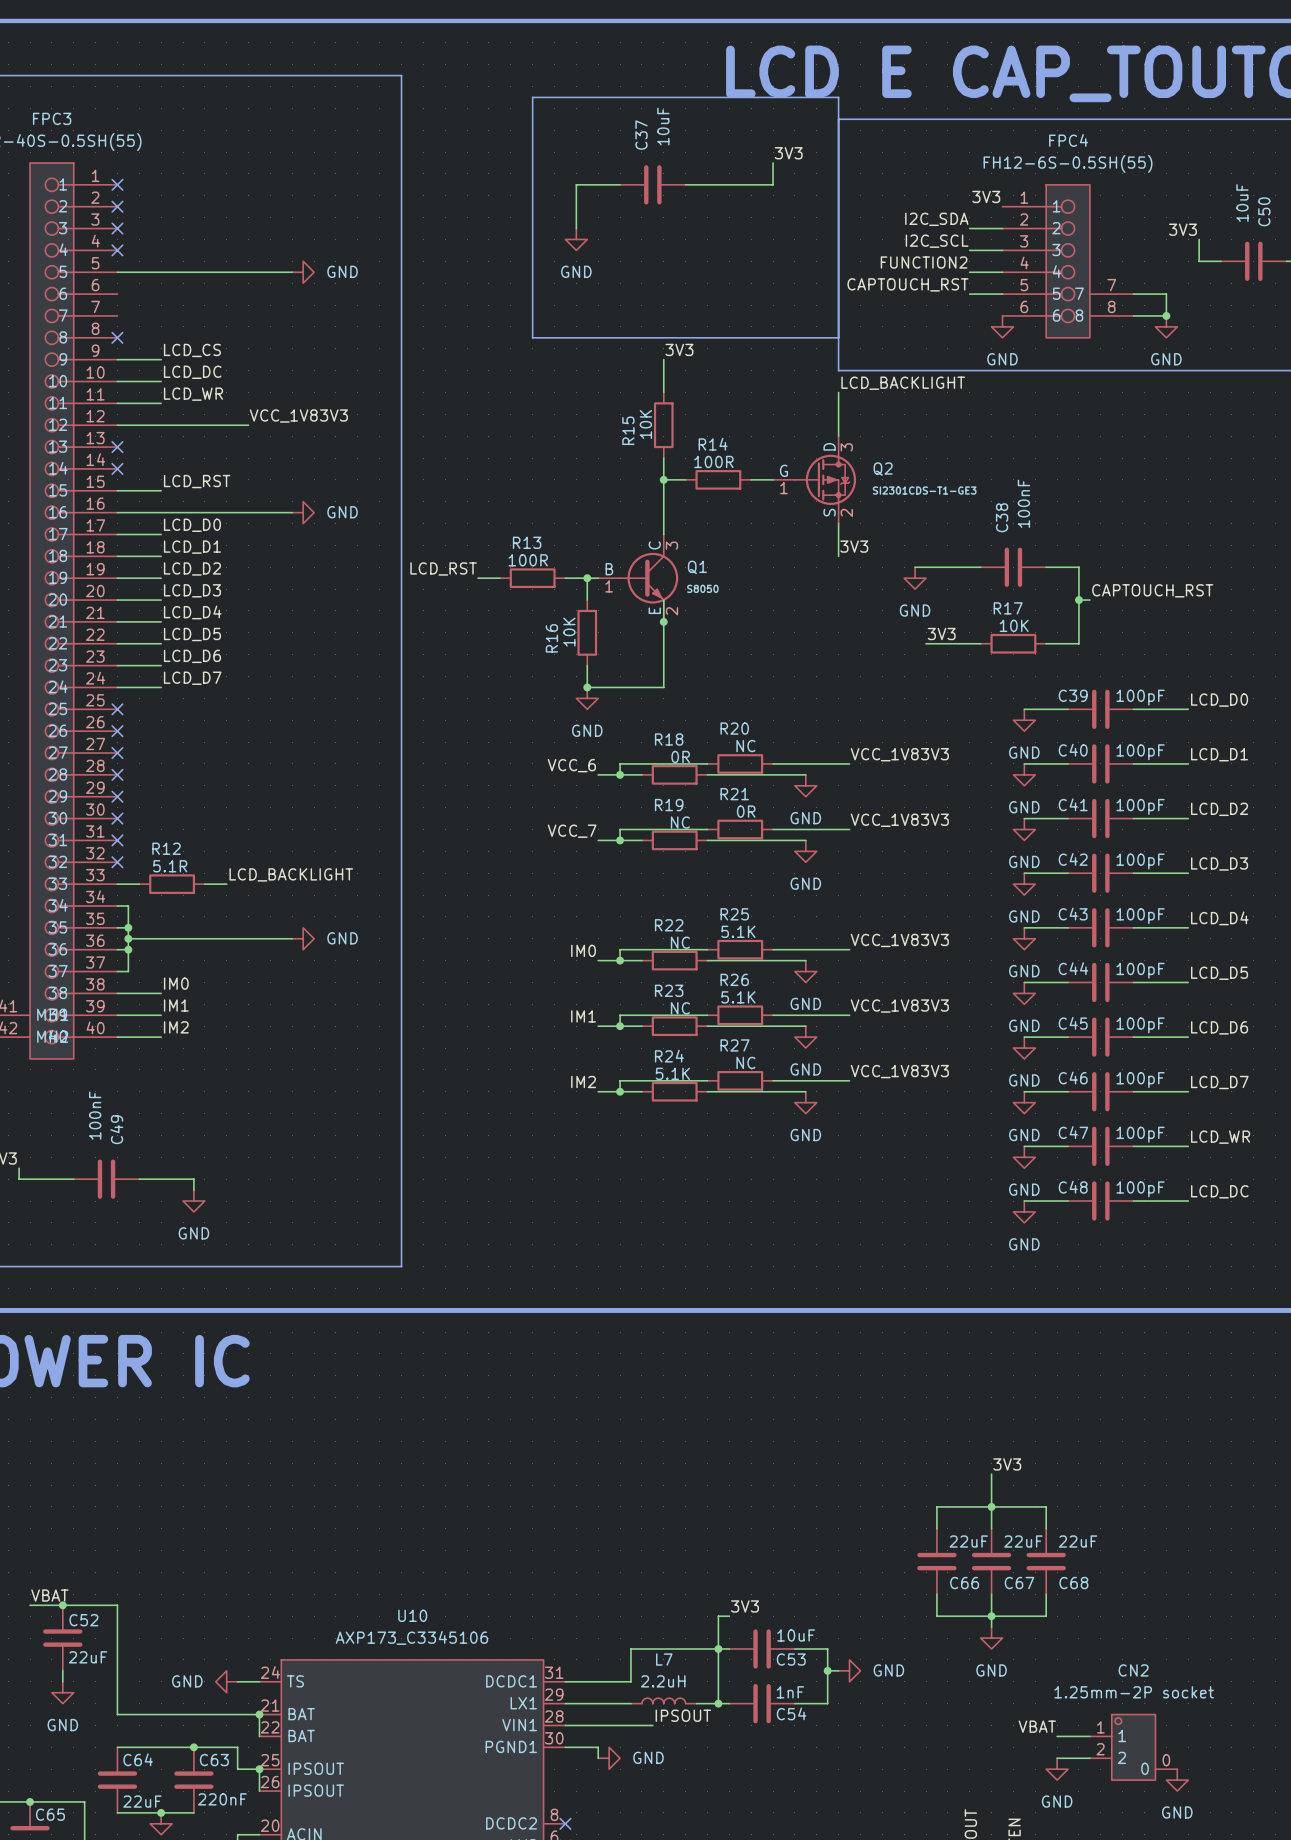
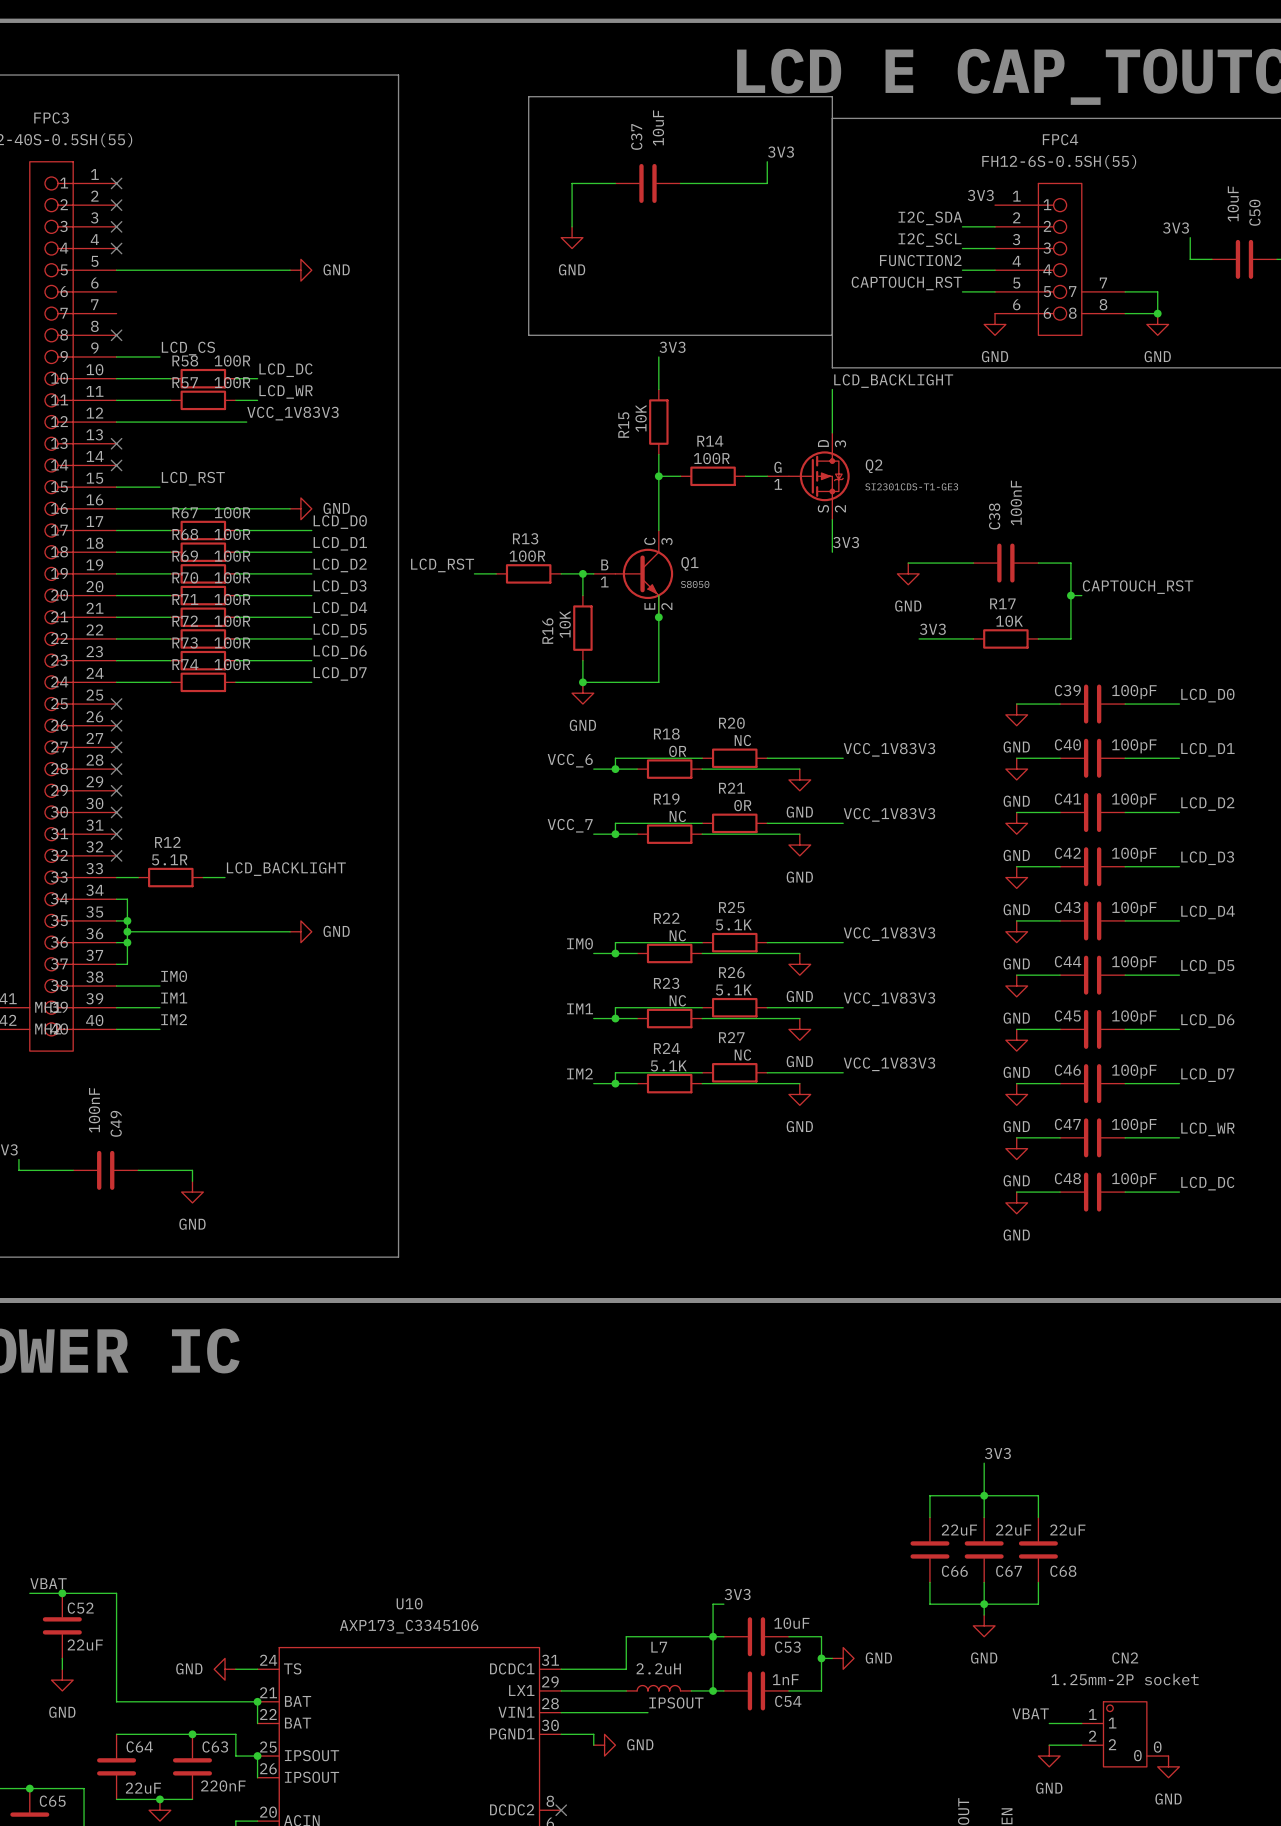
label position: LCD_DC (192, 372) -> LCD_DC (285, 370)
wire: none -> (159, 378) (170, 378)
R58: none -> 100R (203, 378)
wire: none -> (235, 378) (257, 378)
label position: LCD_WR (193, 394) -> LCD_WR (286, 391)
wire: none -> (159, 400) (170, 400)
R57: none -> 100R (203, 400)
wire: none -> (235, 400) (257, 400)
label position: LCD_D0 (192, 525) -> LCD_D0 (340, 522)
wire: none -> (159, 530) (170, 530)
R67: none -> 100R (203, 530)
wire: none -> (235, 530) (311, 530)
label position: LCD_D1 (192, 547) -> LCD_D1 (340, 543)
wire: none -> (159, 552) (170, 552)
R68: none -> 100R (203, 552)
wire: none -> (235, 552) (311, 552)
label position: LCD_D2 (192, 568) -> LCD_D2 (340, 565)
wire: none -> (159, 573) (170, 573)
R69: none -> 100R (203, 573)
wire: none -> (235, 573) (311, 573)
label position: LCD_D3 (192, 590) -> LCD_D3 (340, 587)
wire: none -> (159, 595) (170, 595)
R70: none -> 100R (203, 595)
wire: none -> (235, 595) (311, 595)
label position: LCD_D4 (192, 612) -> LCD_D4 (340, 608)
wire: none -> (159, 617) (170, 617)
R71: none -> 100R (203, 617)
wire: none -> (235, 617) (311, 617)
label position: LCD_D5 (192, 634) -> LCD_D5 (340, 630)
wire: none -> (159, 638) (170, 638)
R72: none -> 100R (203, 638)
wire: none -> (235, 638) (311, 638)
label position: LCD_D6 (192, 656) -> LCD_D6 (340, 652)
wire: none -> (159, 660) (170, 660)
R73: none -> 100R (203, 660)
wire: none -> (235, 660) (311, 660)
label position: LCD_D7 (192, 678) -> LCD_D7 (340, 673)
wire: none -> (159, 682) (170, 682)
R74: none -> 100R (203, 682)
wire: none -> (235, 682) (311, 682)

